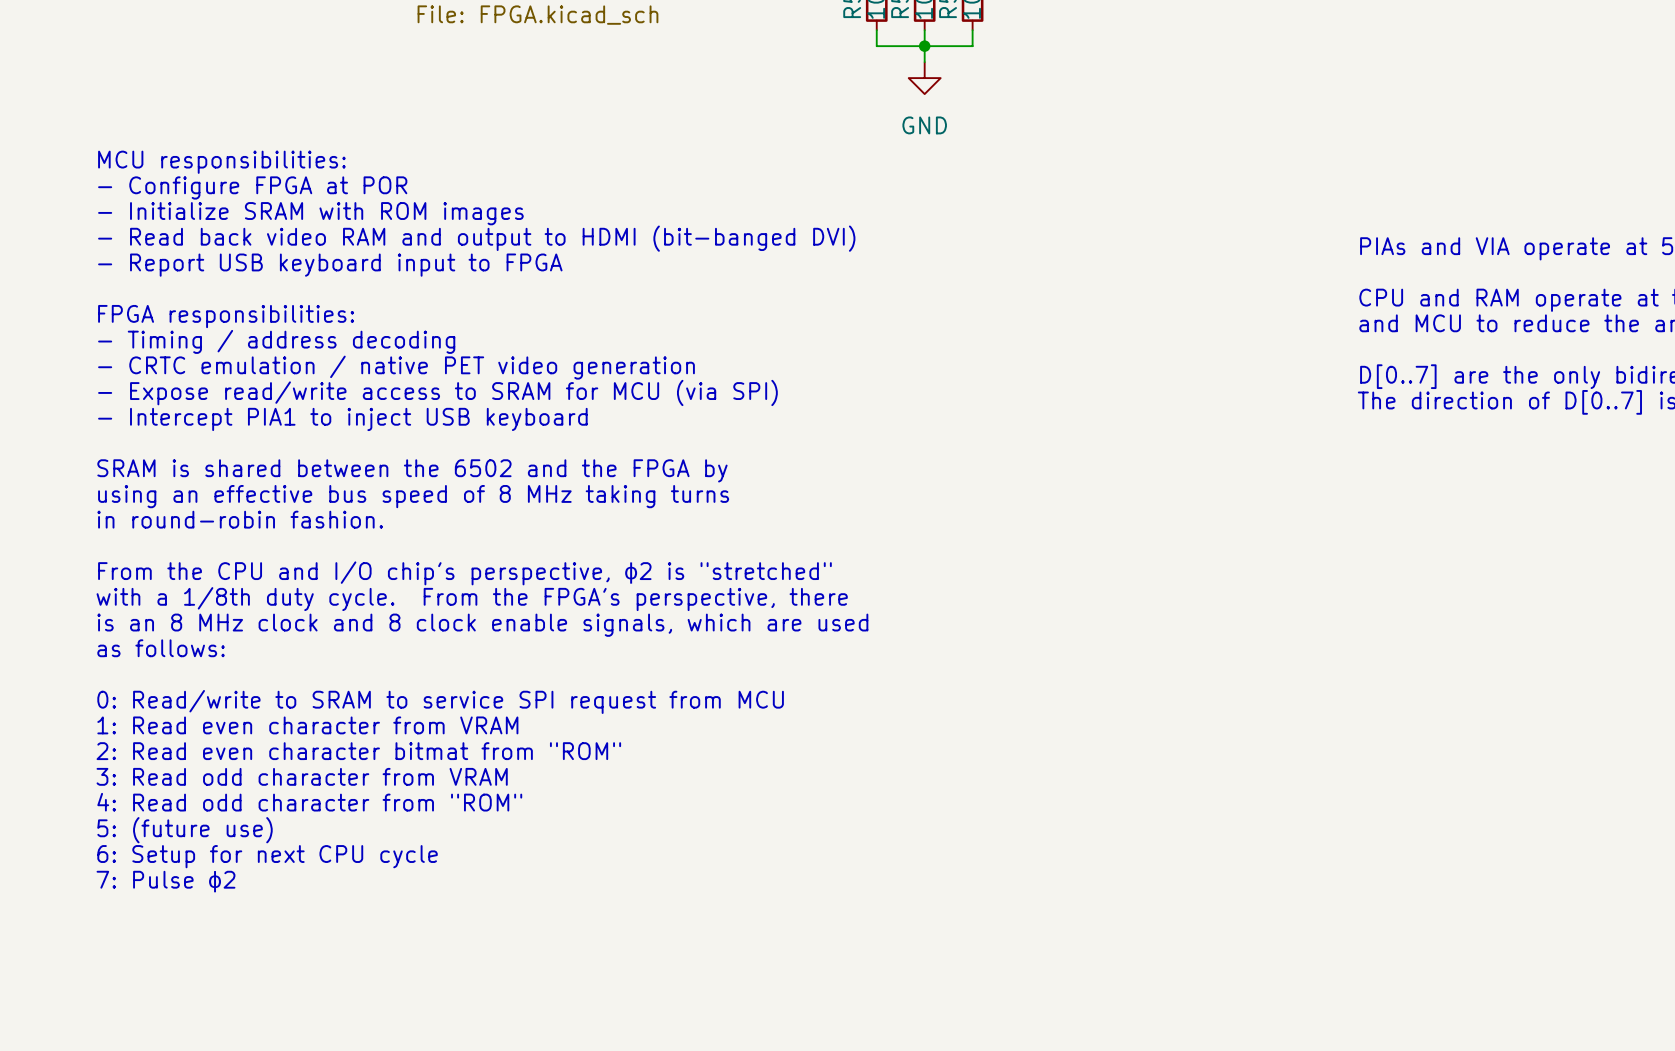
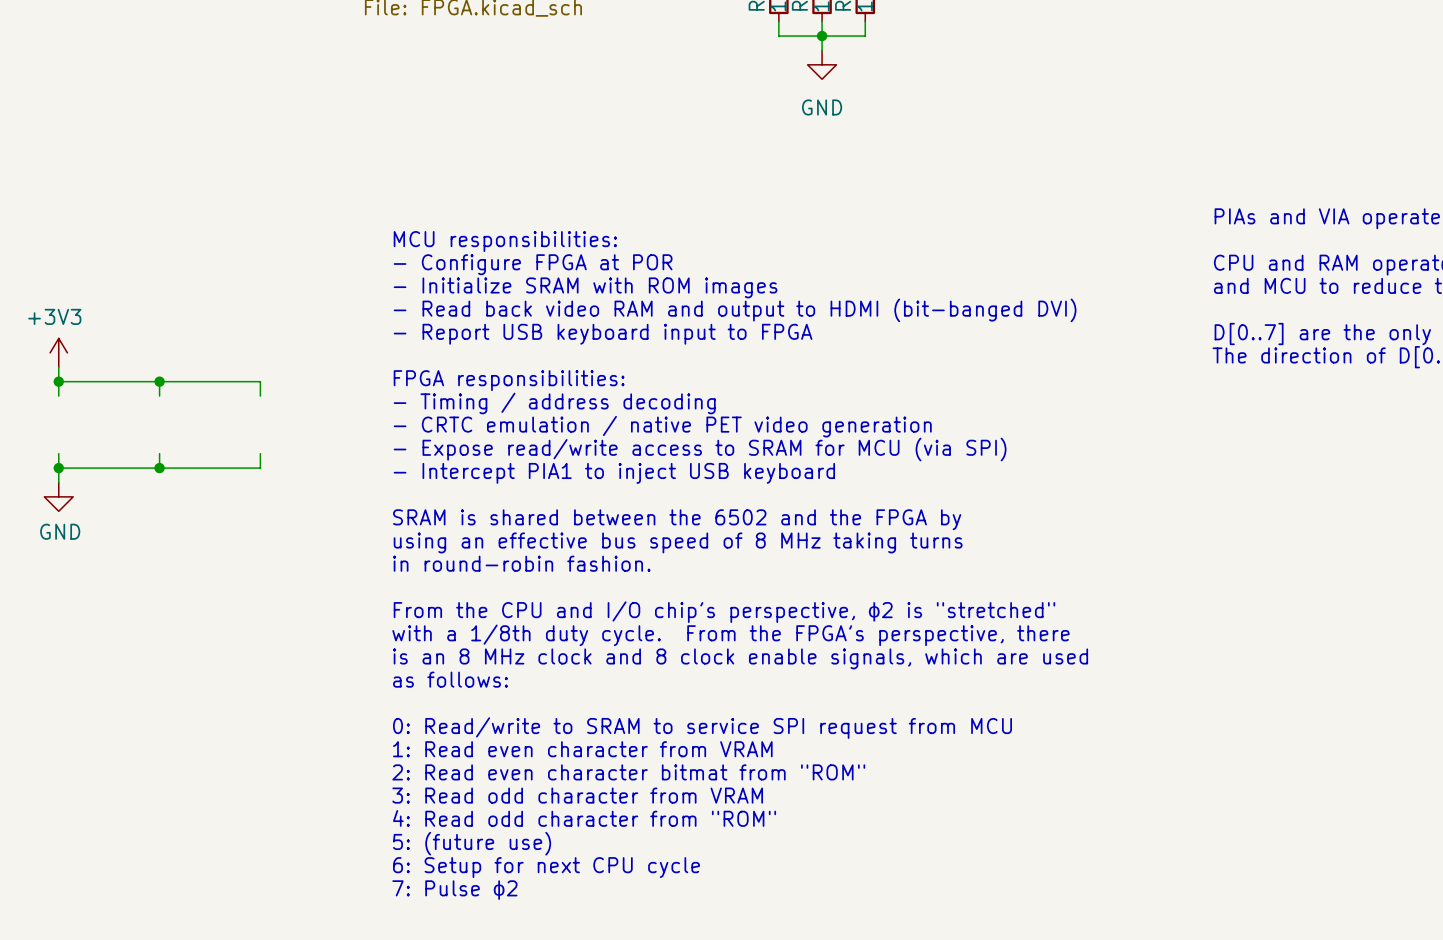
text: MCU responsibilities: (221, 162) -> none
text: - Configure FPGA at POR (252, 187) -> none
text: - Initialize SRAM with ROM images (310, 213) -> none
text: - Read back video RAM and output to HDMI (bit-banged DVI) (476, 238) -> none
text: - Report USB keyboard input to FPGA (330, 265) -> none
text: none -> MCU responsibilities: (505, 241)
text: none -> - Configure FPGA at POR (533, 264)
text: FPGA responsibilities: (226, 316) -> none
text: none -> - Initialize SRAM with ROM images (585, 287)
text: - Timing / address decoding (276, 341) -> none
text: none -> - Read back video RAM and output to HDMI (bit-banged DVI) (735, 310)
text: - CRTC emulation / native PET video generation (396, 367) -> none
text: none -> - Report USB keyboard input to FPGA (603, 334)
text: - Expose read/write access to SRAM for MCU (via SPI) (437, 392) -> none
power symbol: none -> +3V3 (58, 352)
wire: none -> (58, 367) (58, 396)
text: - Intercept PIA1 to inject USB keyboard (342, 419) -> none
text: none -> FPGA responsibilities: (509, 380)
wire: none -> (58, 381) (260, 381) (260, 396)
junction: none -> (58, 381)
wire: none -> (159, 381) (159, 396)
junction: none -> (159, 381)
text: none -> - Timing / address decoding (554, 403)
text: SRAM is shared between the 6502 and the FPGA by (412, 470) -> none
text: none -> - CRTC emulation / native PET video generation (662, 426)
text: using an effective bus speed of 8 MHz taking turns (413, 496) -> none
text: none -> - Expose read/write access to SRAM for MCU (via SPI) (700, 449)
wire: none -> (58, 453) (58, 482)
wire: none -> (159, 453) (159, 468)
wire: none -> (260, 453) (260, 468) (58, 468)
text: in round-robin fashion. (240, 519) -> none
junction: none -> (58, 468)
junction: none -> (159, 468)
text: none -> - Intercept PIA1 to inject USB keyboard (614, 473)
power symbol: none -> GND (58, 496)
text: From the CPU and I/O chip's perspective, ϕ2 is "stretched" (464, 573) -> none
text: none -> SRAM is shared between the 6502 and the FPGA by (677, 519)
text: with a 1/8th duty cycle. From the FPGA's perspective, there (472, 599) -> none
text: none -> using an effective bus speed of 8 MHz taking turns (678, 542)
text: is an 8 MHz clock and 8 clock enable signals, which are used (482, 625) -> none
text: none -> in round-robin fashion. (521, 563)
text: as follows: (161, 648) -> none
text: none -> From the CPU and I/O chip's perspective, ϕ2 is "stretched" (724, 612)
text: 0: Read/write to SRAM to service SPI request from MCU (440, 701) -> none
text: none -> with a 1/8th duty cycle. From the FPGA's perspective, there (730, 635)
text: 1: Read even character from VRAM (307, 725) -> none
text: none -> is an 8 MHz clock and 8 clock enable signals, which are used (740, 658)
text: 2: Read even character bitmat from "ROM" (358, 751) -> none
text: none -> as follows: (450, 679)
text: 3: Read odd character from VRAM (302, 776) -> none
text: 4: Read odd character from "ROM" (309, 802) -> none
text: none -> 0: Read/write to SRAM to service SPI request from MCU (702, 728)
text: 5: (future use) (185, 830) -> none
text: none -> 1: Read even character from VRAM (582, 749)
text: 6: Setup for next CPU cycle (267, 856) -> none
text: none -> 2: Read even character bitmat from "ROM" (628, 772)
text: 7: Pulse ϕ2 (165, 881) -> none
text: none -> 3: Read odd character from VRAM (577, 795)
text: none -> 4: Read odd character from "ROM" (584, 818)
text: none -> 5: (future use) (472, 843)
text: none -> 6: Setup for next CPU cycle (546, 867)
text: none -> 7: Pulse ϕ2 (454, 890)

